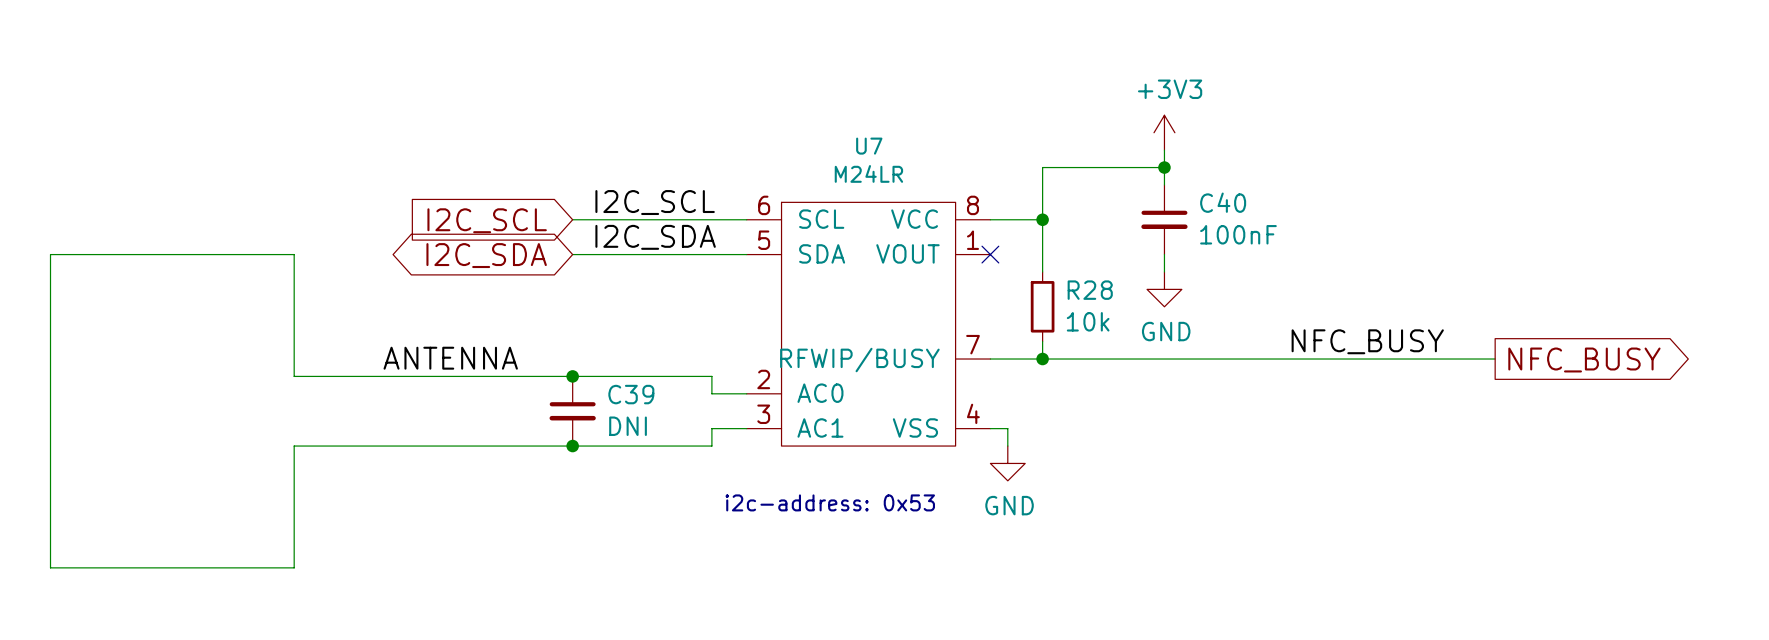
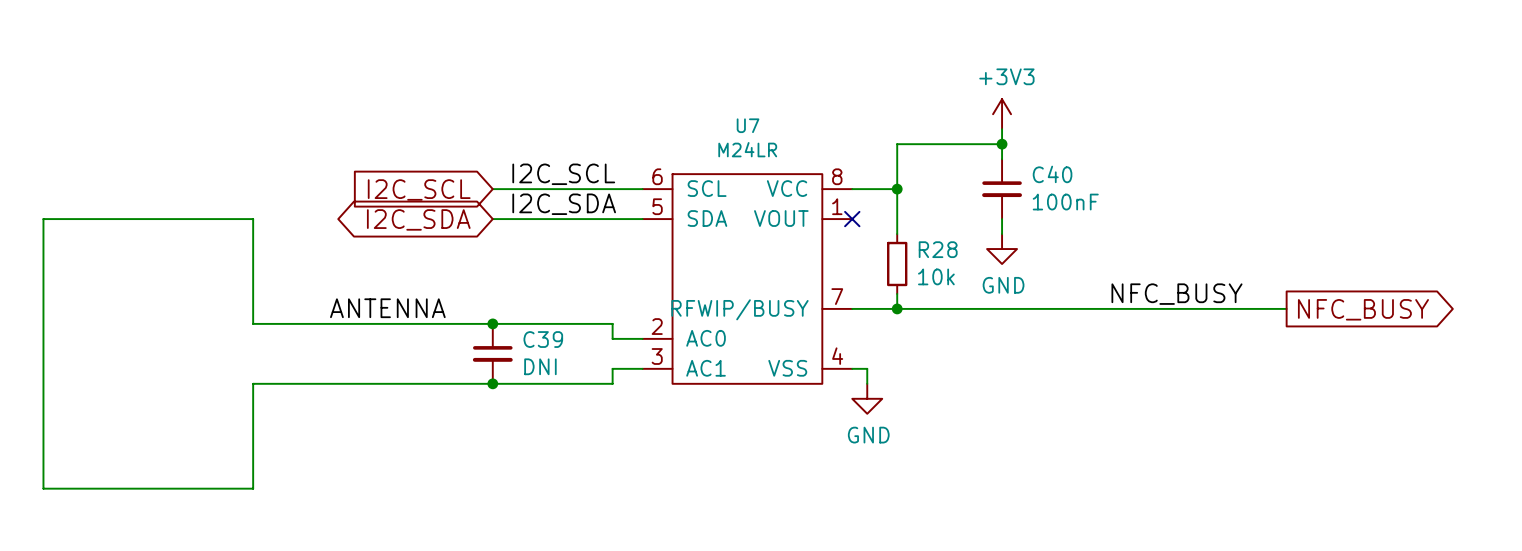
text: i2c-address: 0x53 (830, 502) -> none

